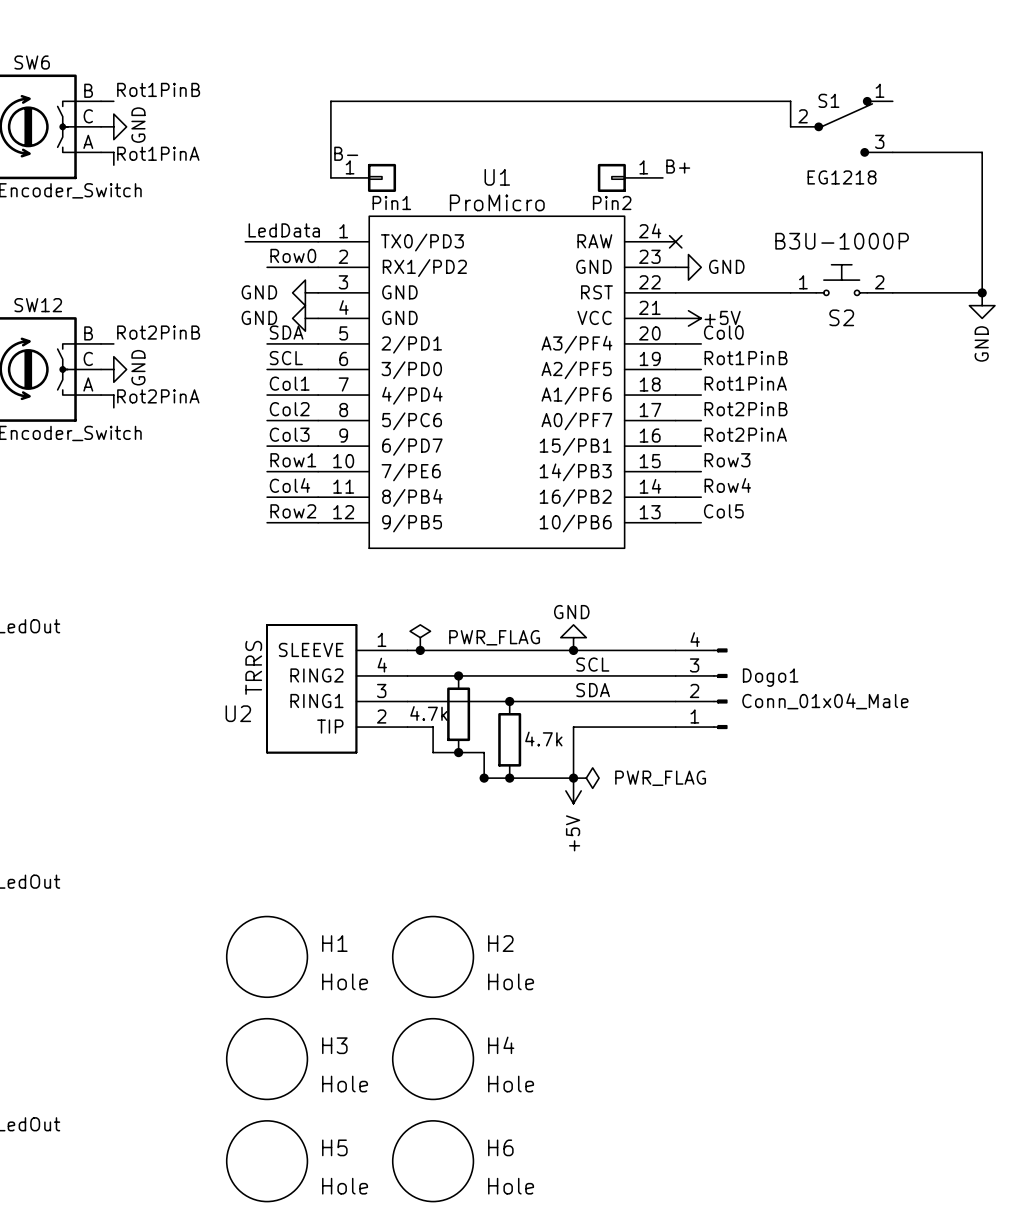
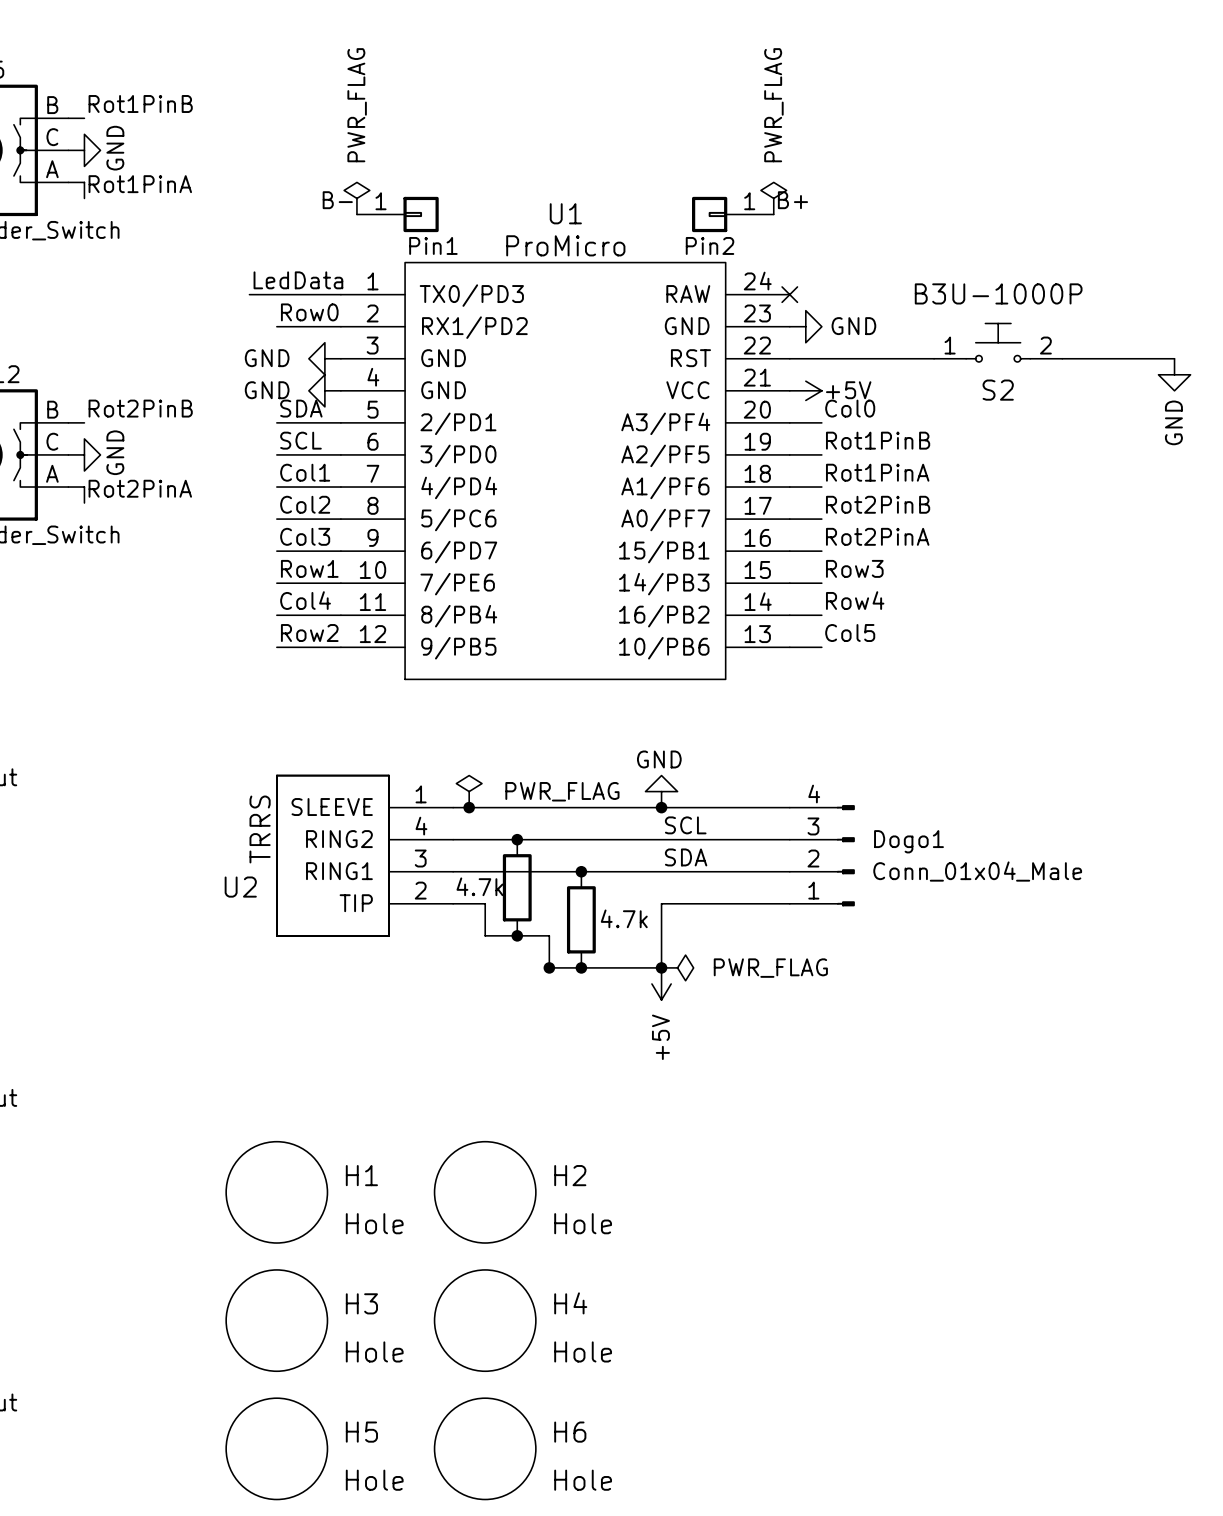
wire: (790, 126) (790, 101) (330, 101) (330, 177) -> none
S1: EG1218 (841, 126) -> none
wire: (892, 152) (982, 152) (982, 292) -> none
label position: B- (346, 153) -> B- (337, 200)
power symbol: none -> PWR_FLAG (356, 198)
power symbol: none -> PWR_FLAG (773, 198)
junction: (982, 292) -> none

